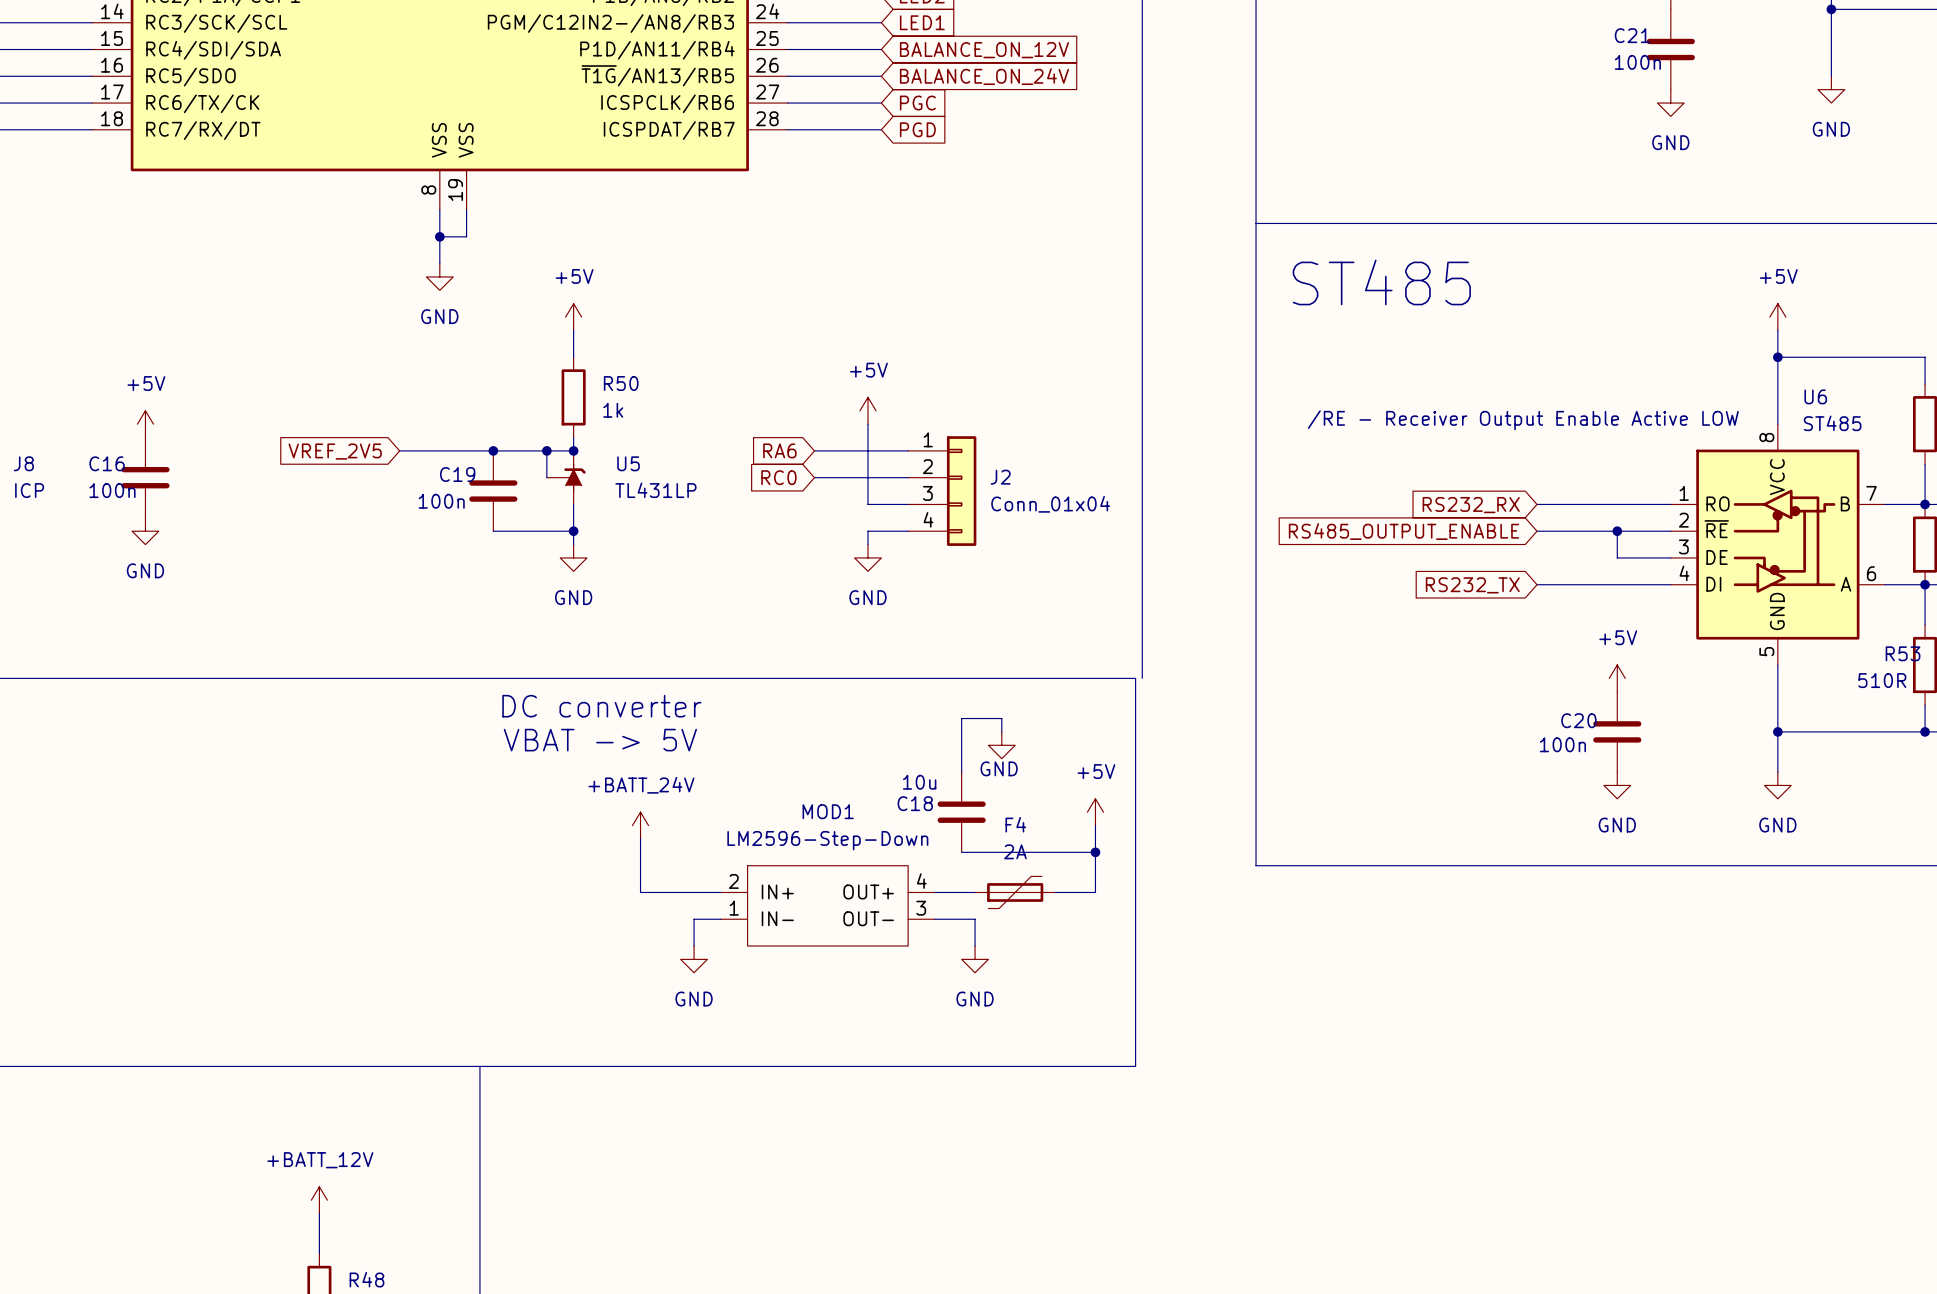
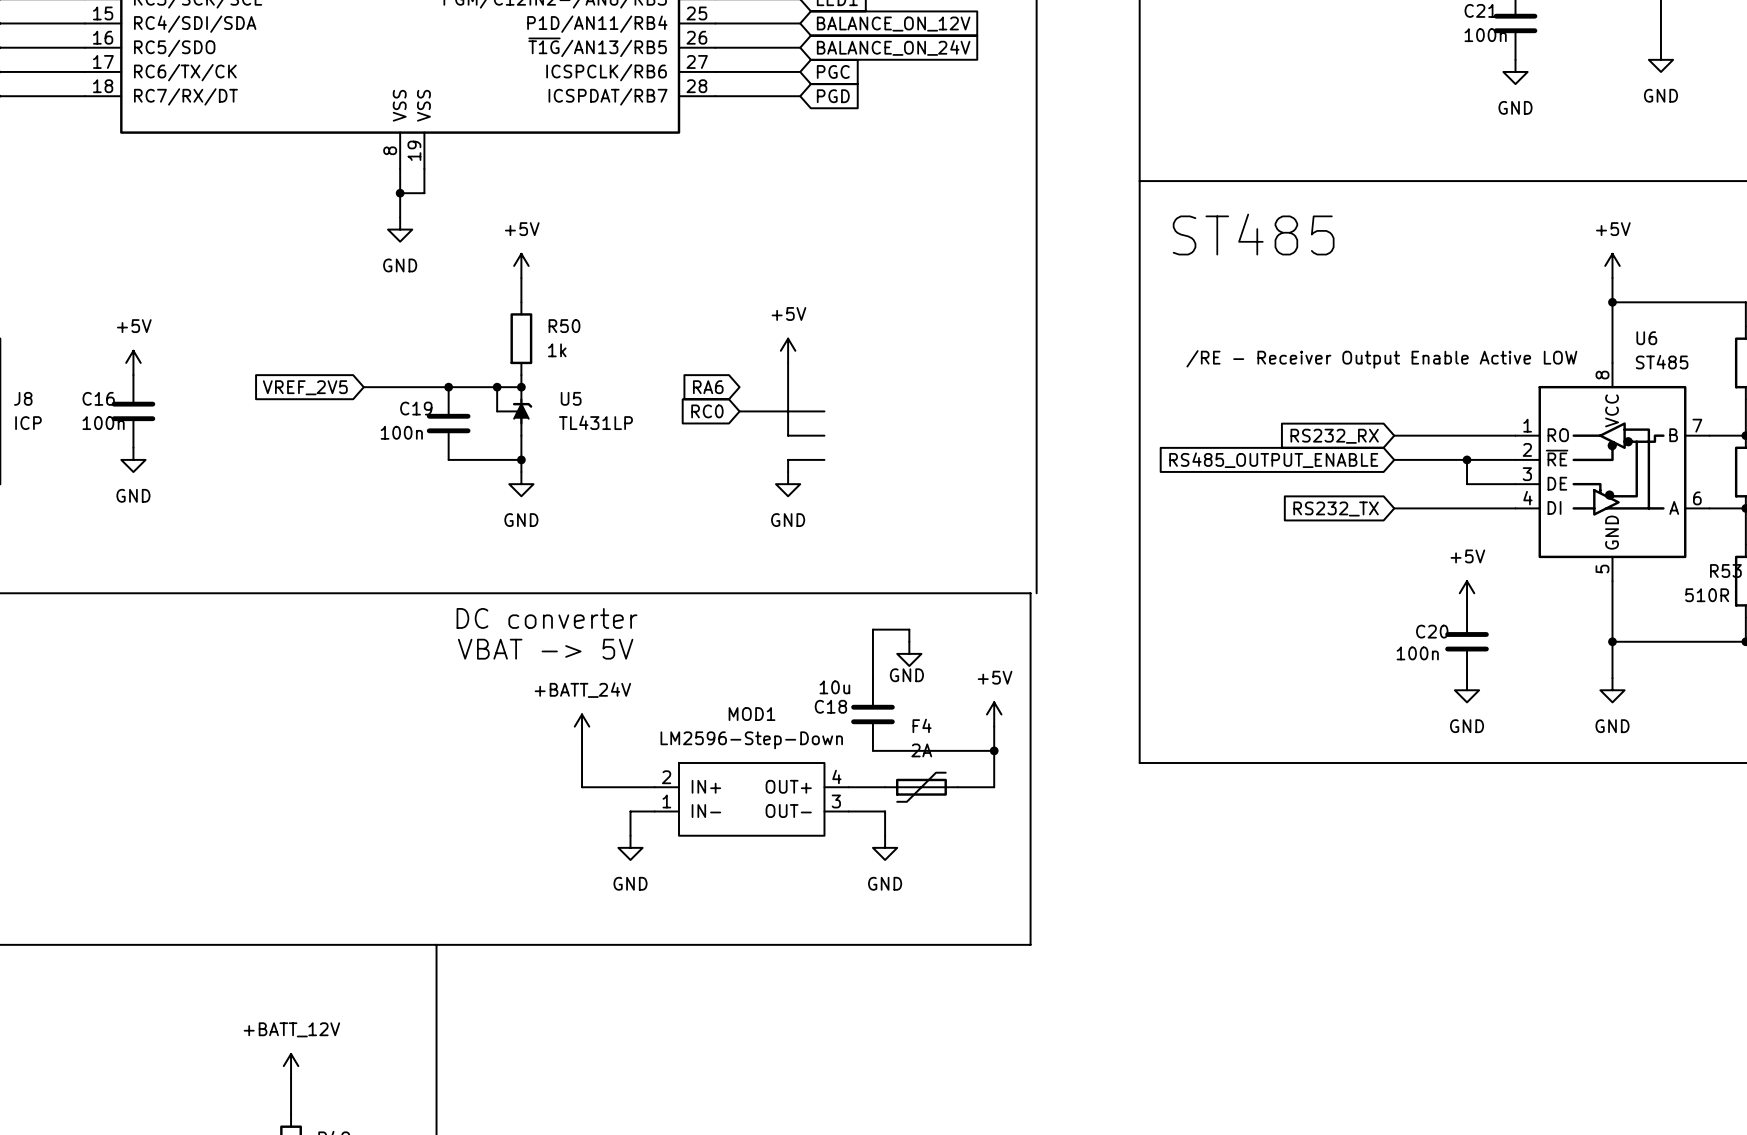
wire: (814, 450) (908, 450) -> none
J2: Conn_01x04 (942, 491) -> none

